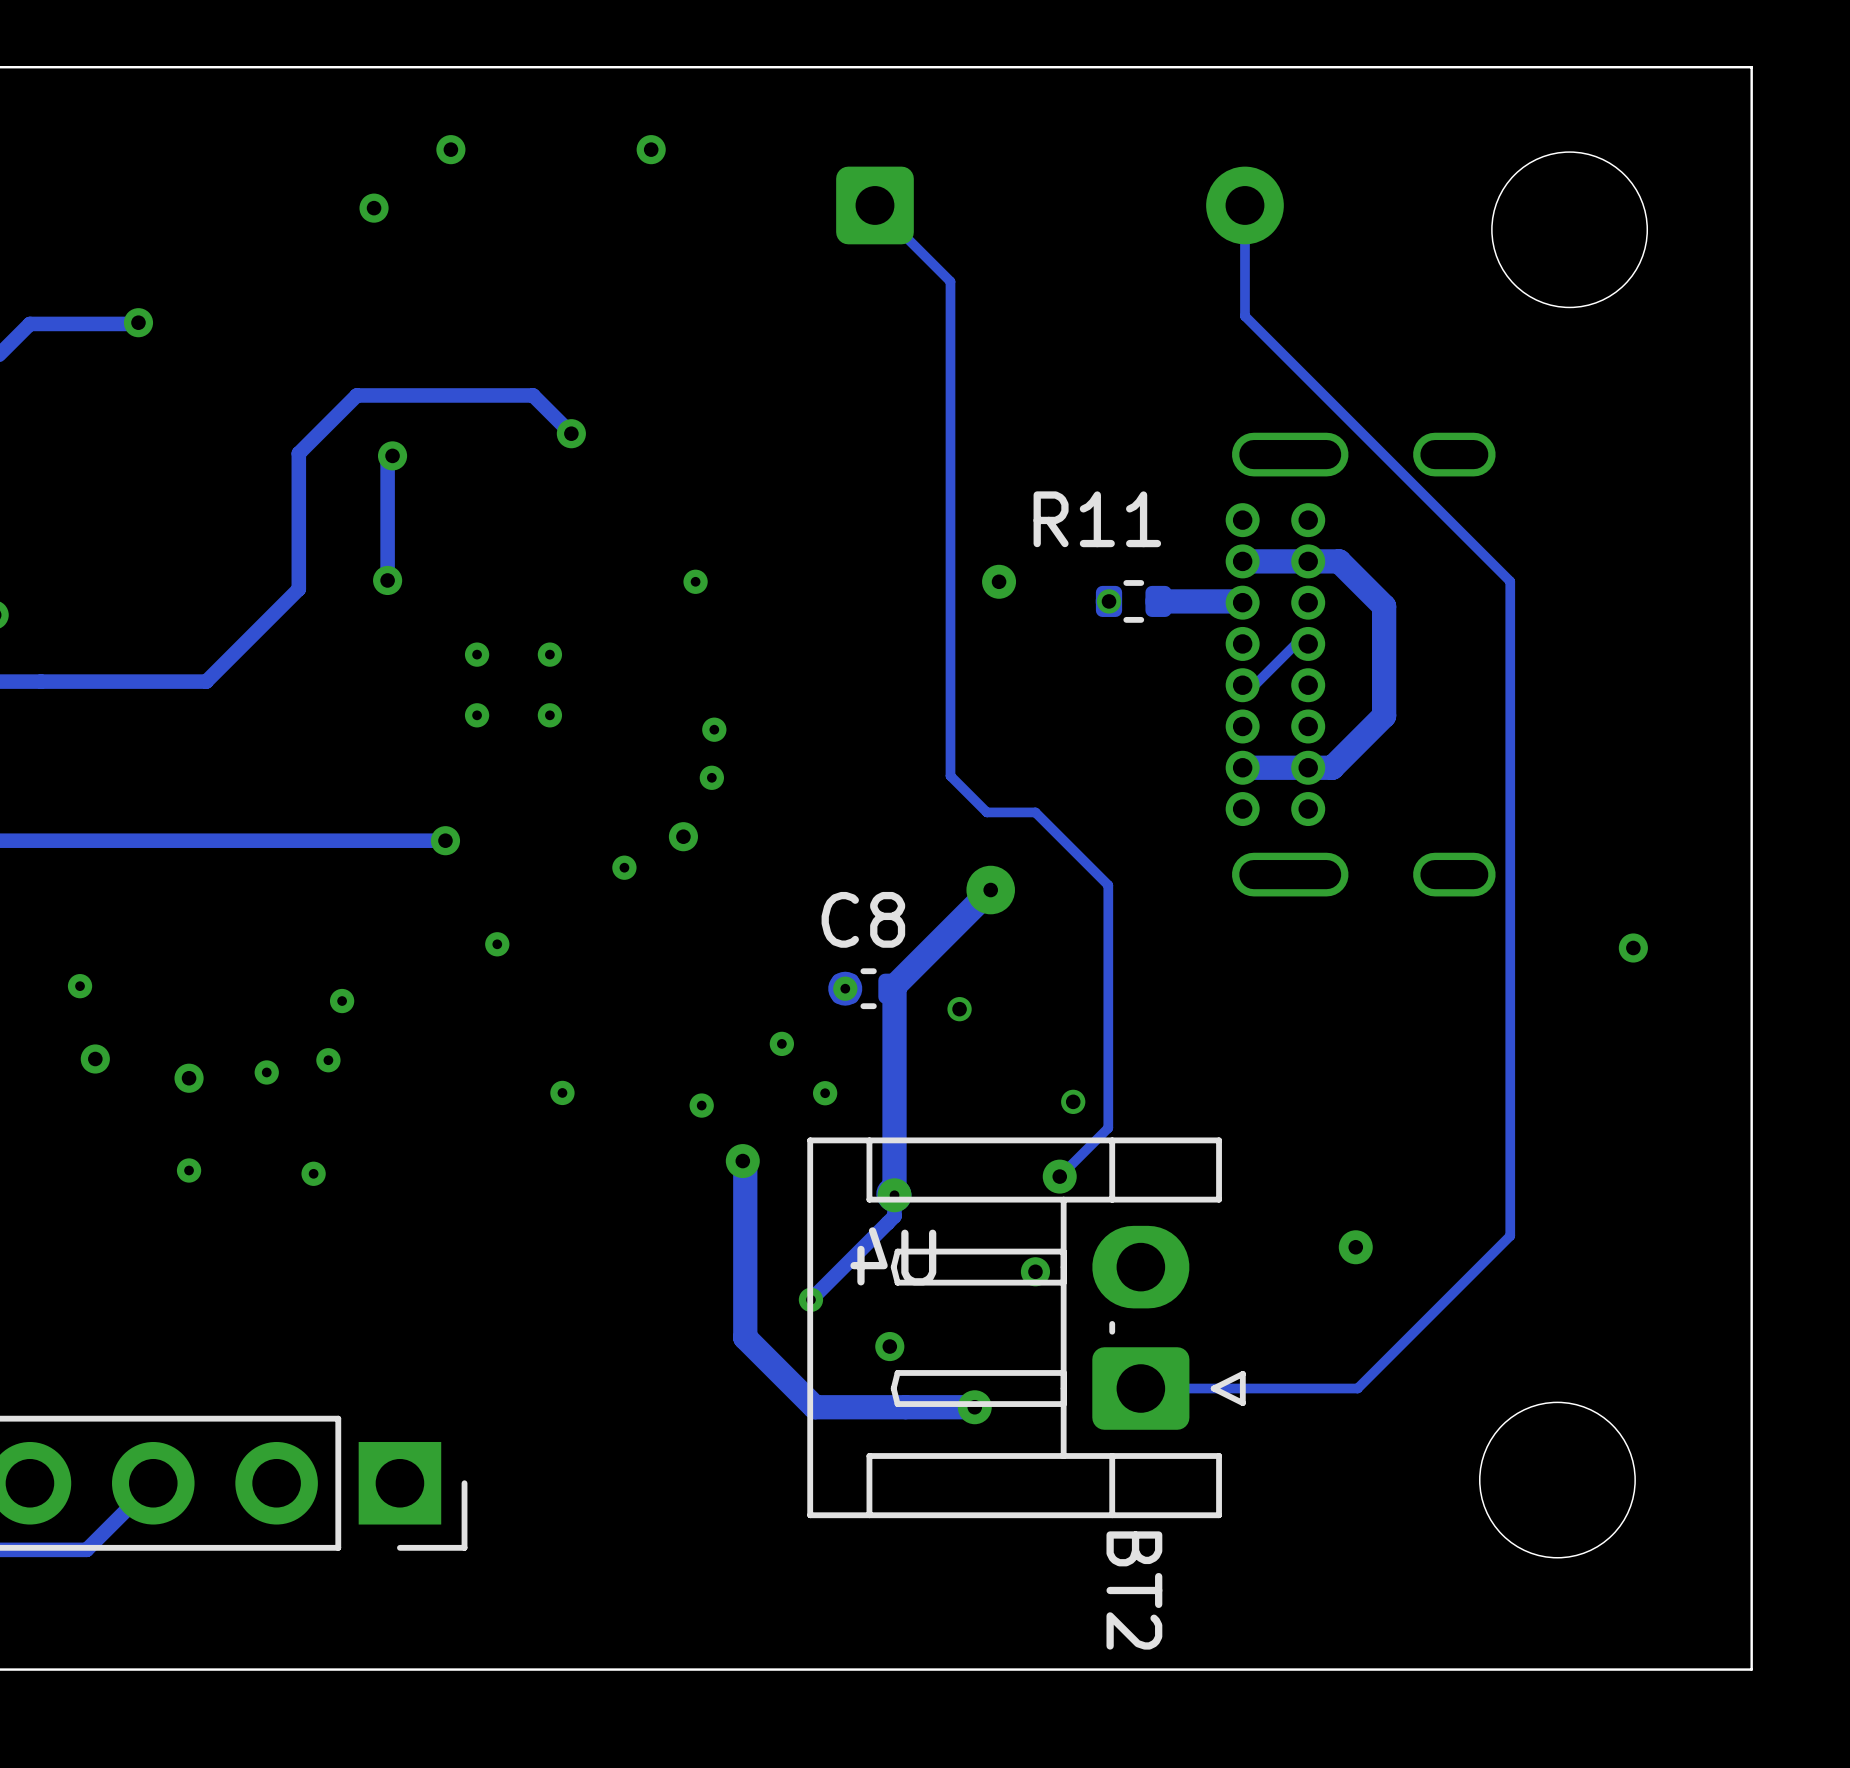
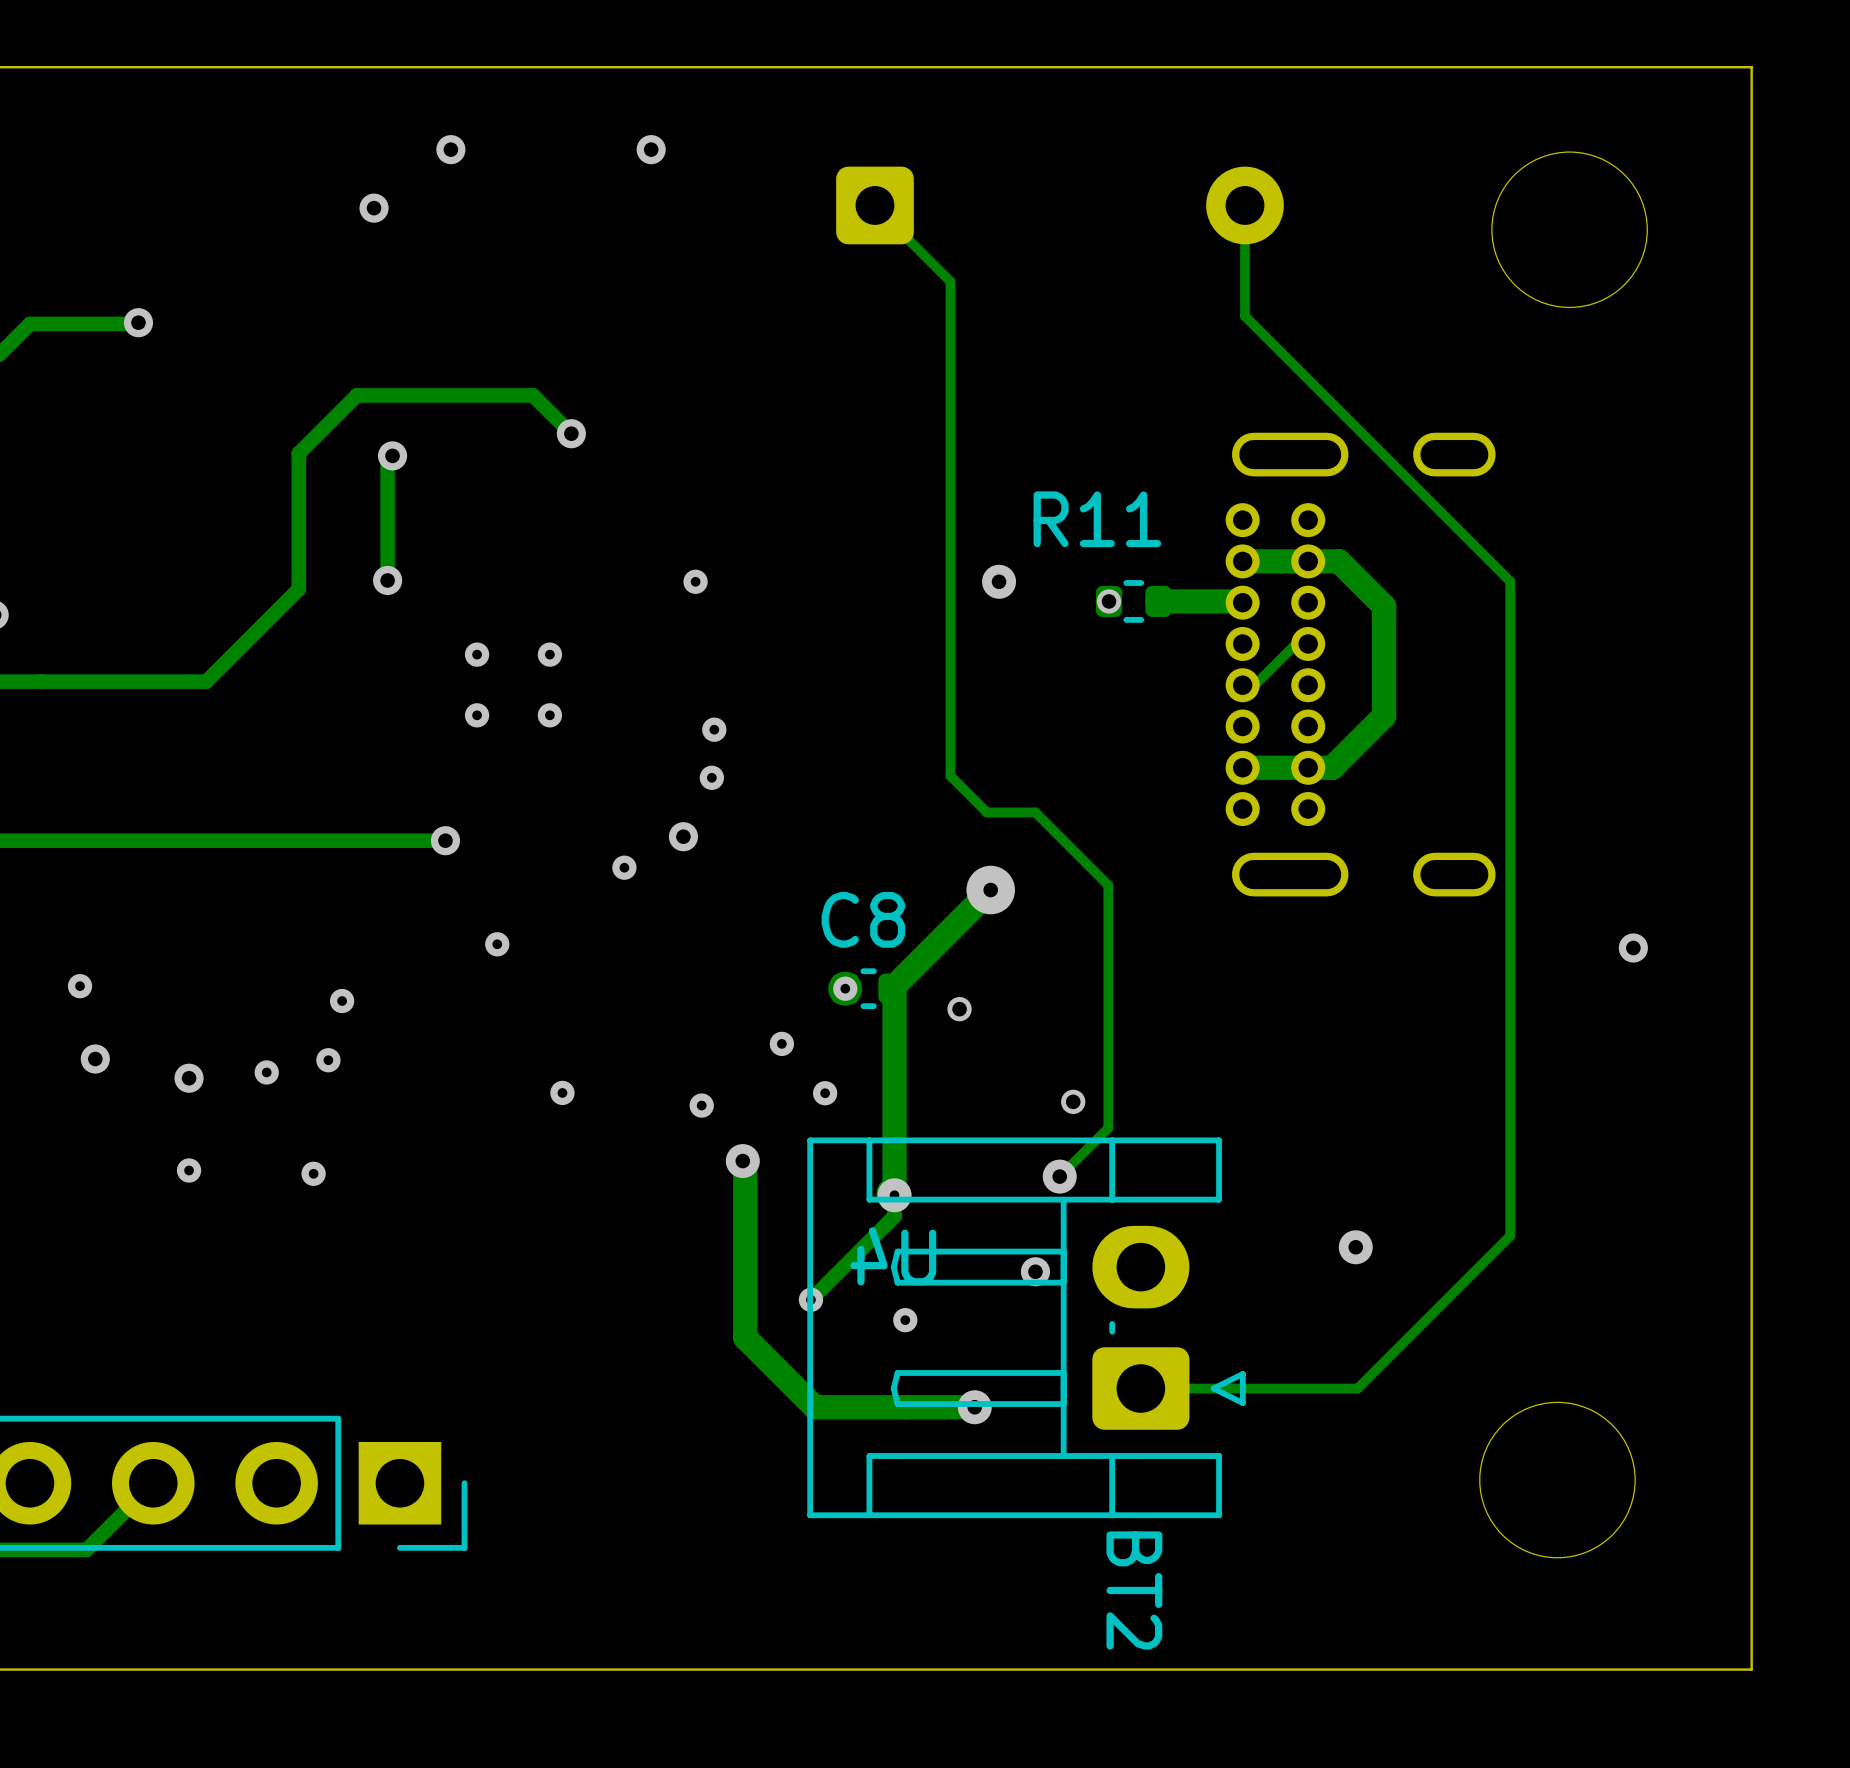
via position: (889, 1346) -> (905, 1320)

